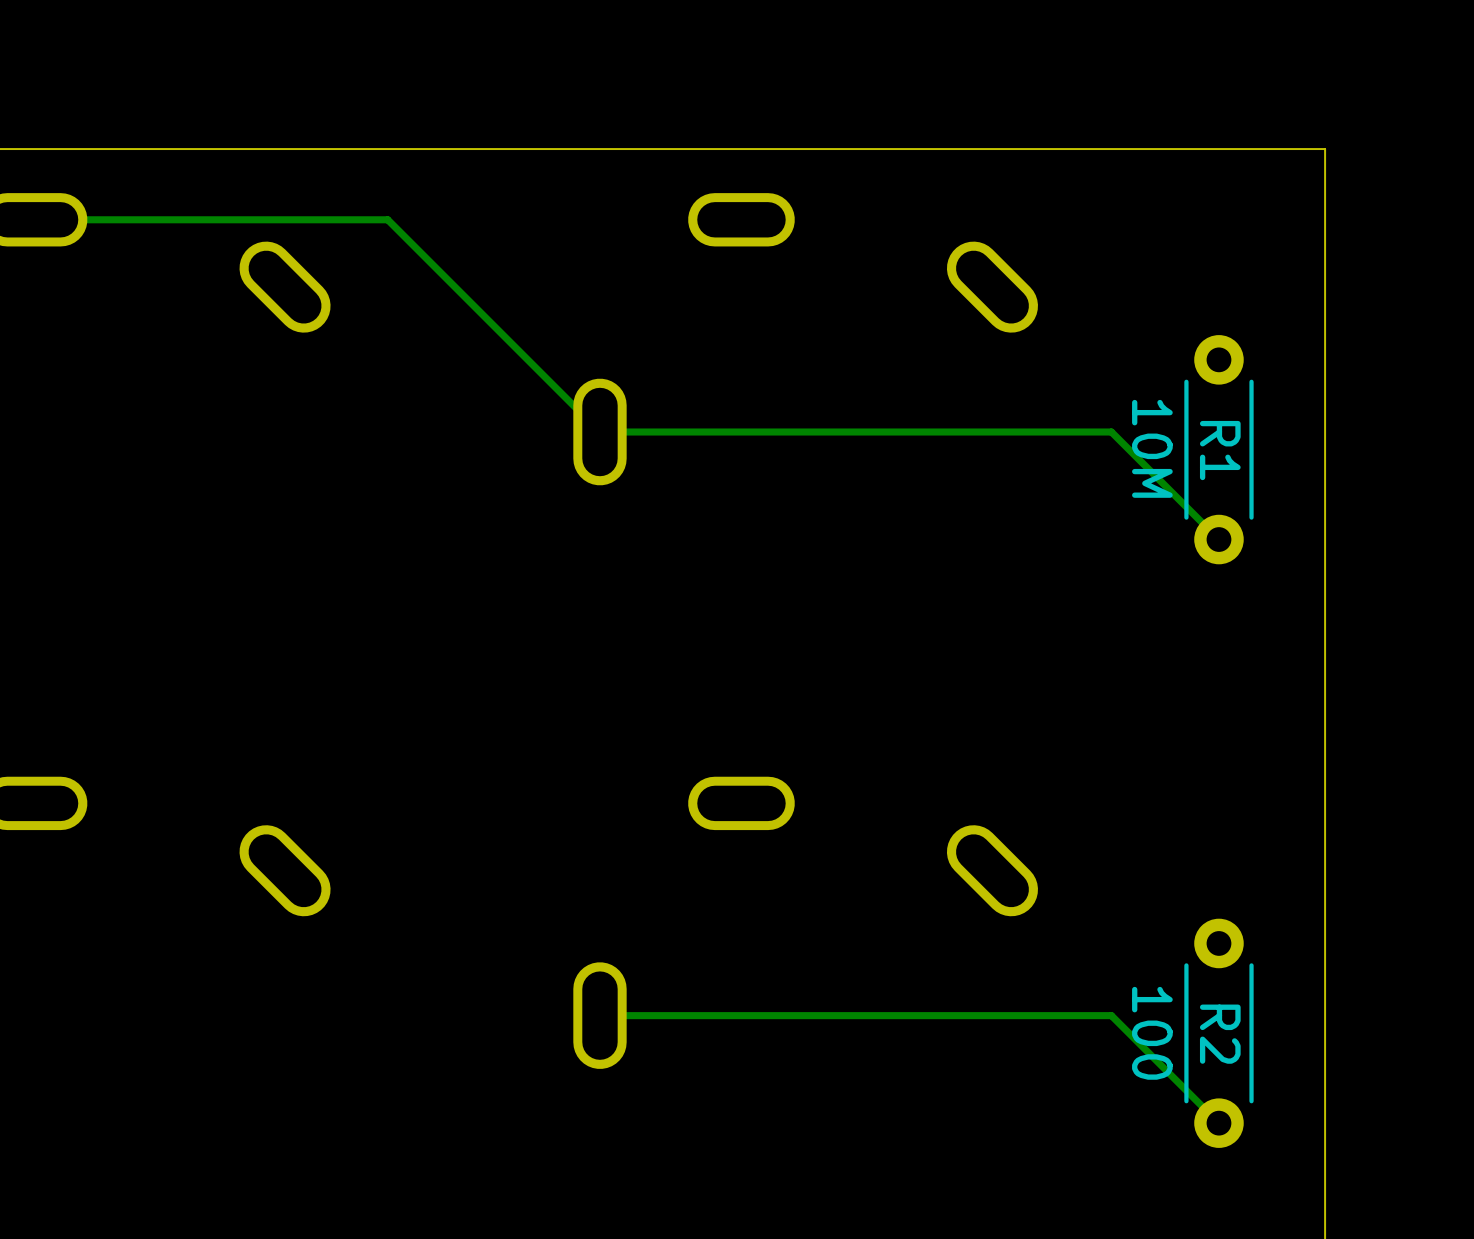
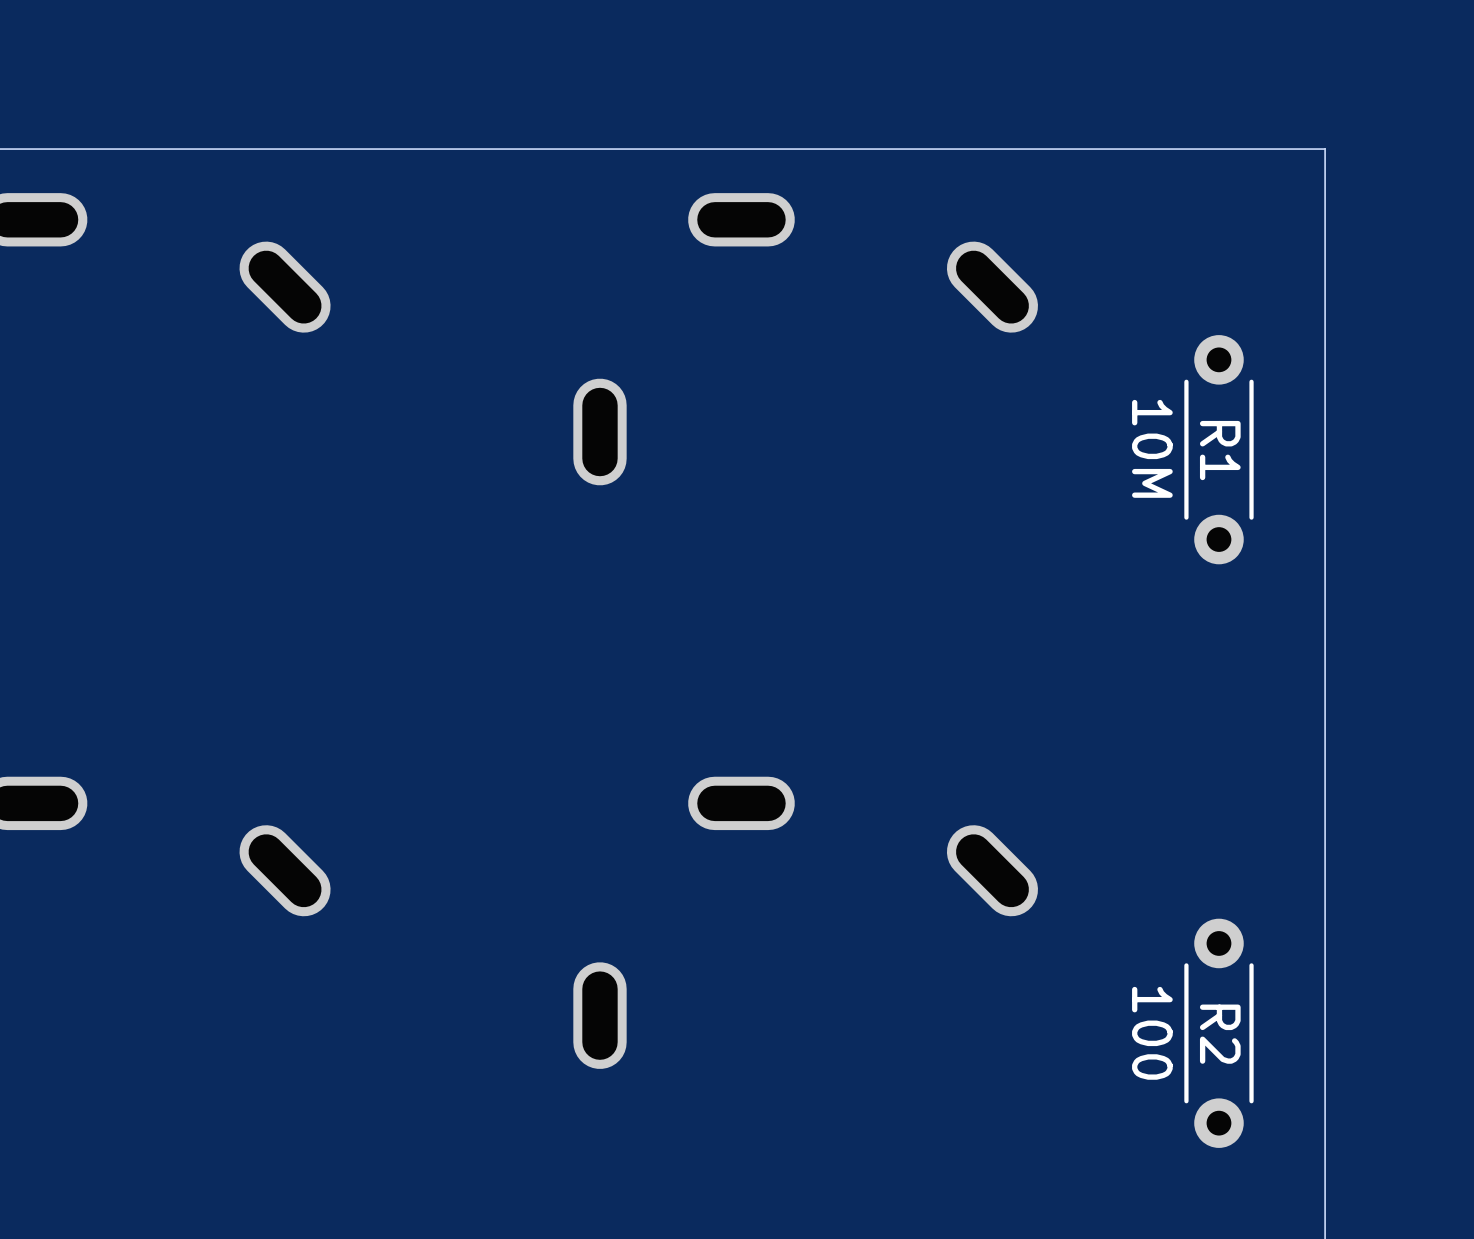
track: (34, 219) (387, 219) (599, 432) (1111, 432) (1218, 539) -> none
track: (599, 1015) (1111, 1015) (1218, 1123) -> none

